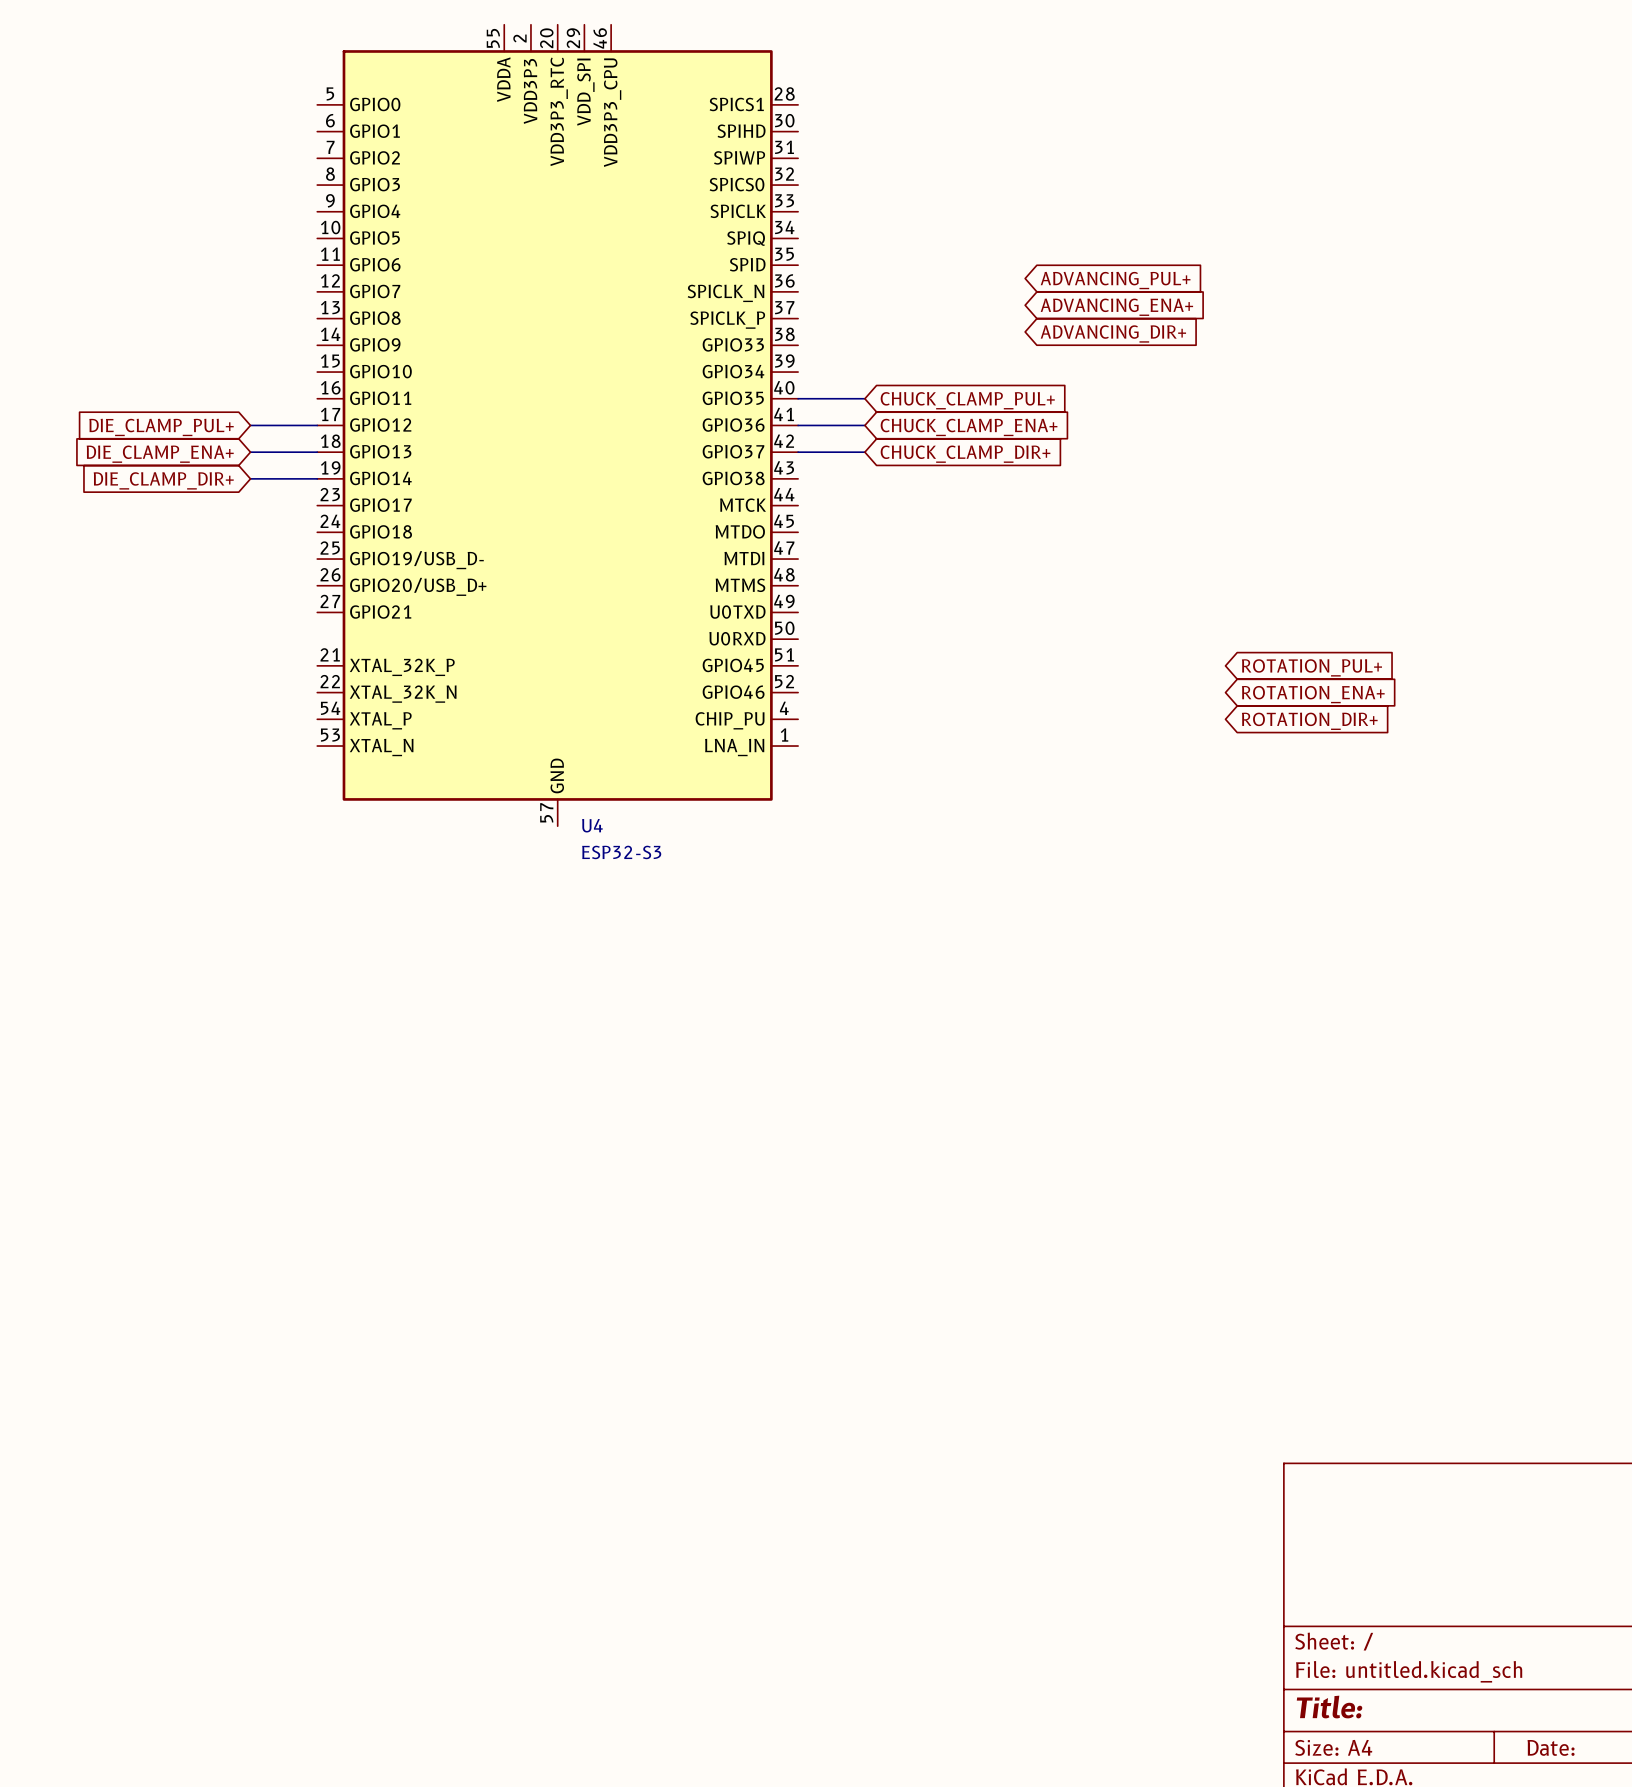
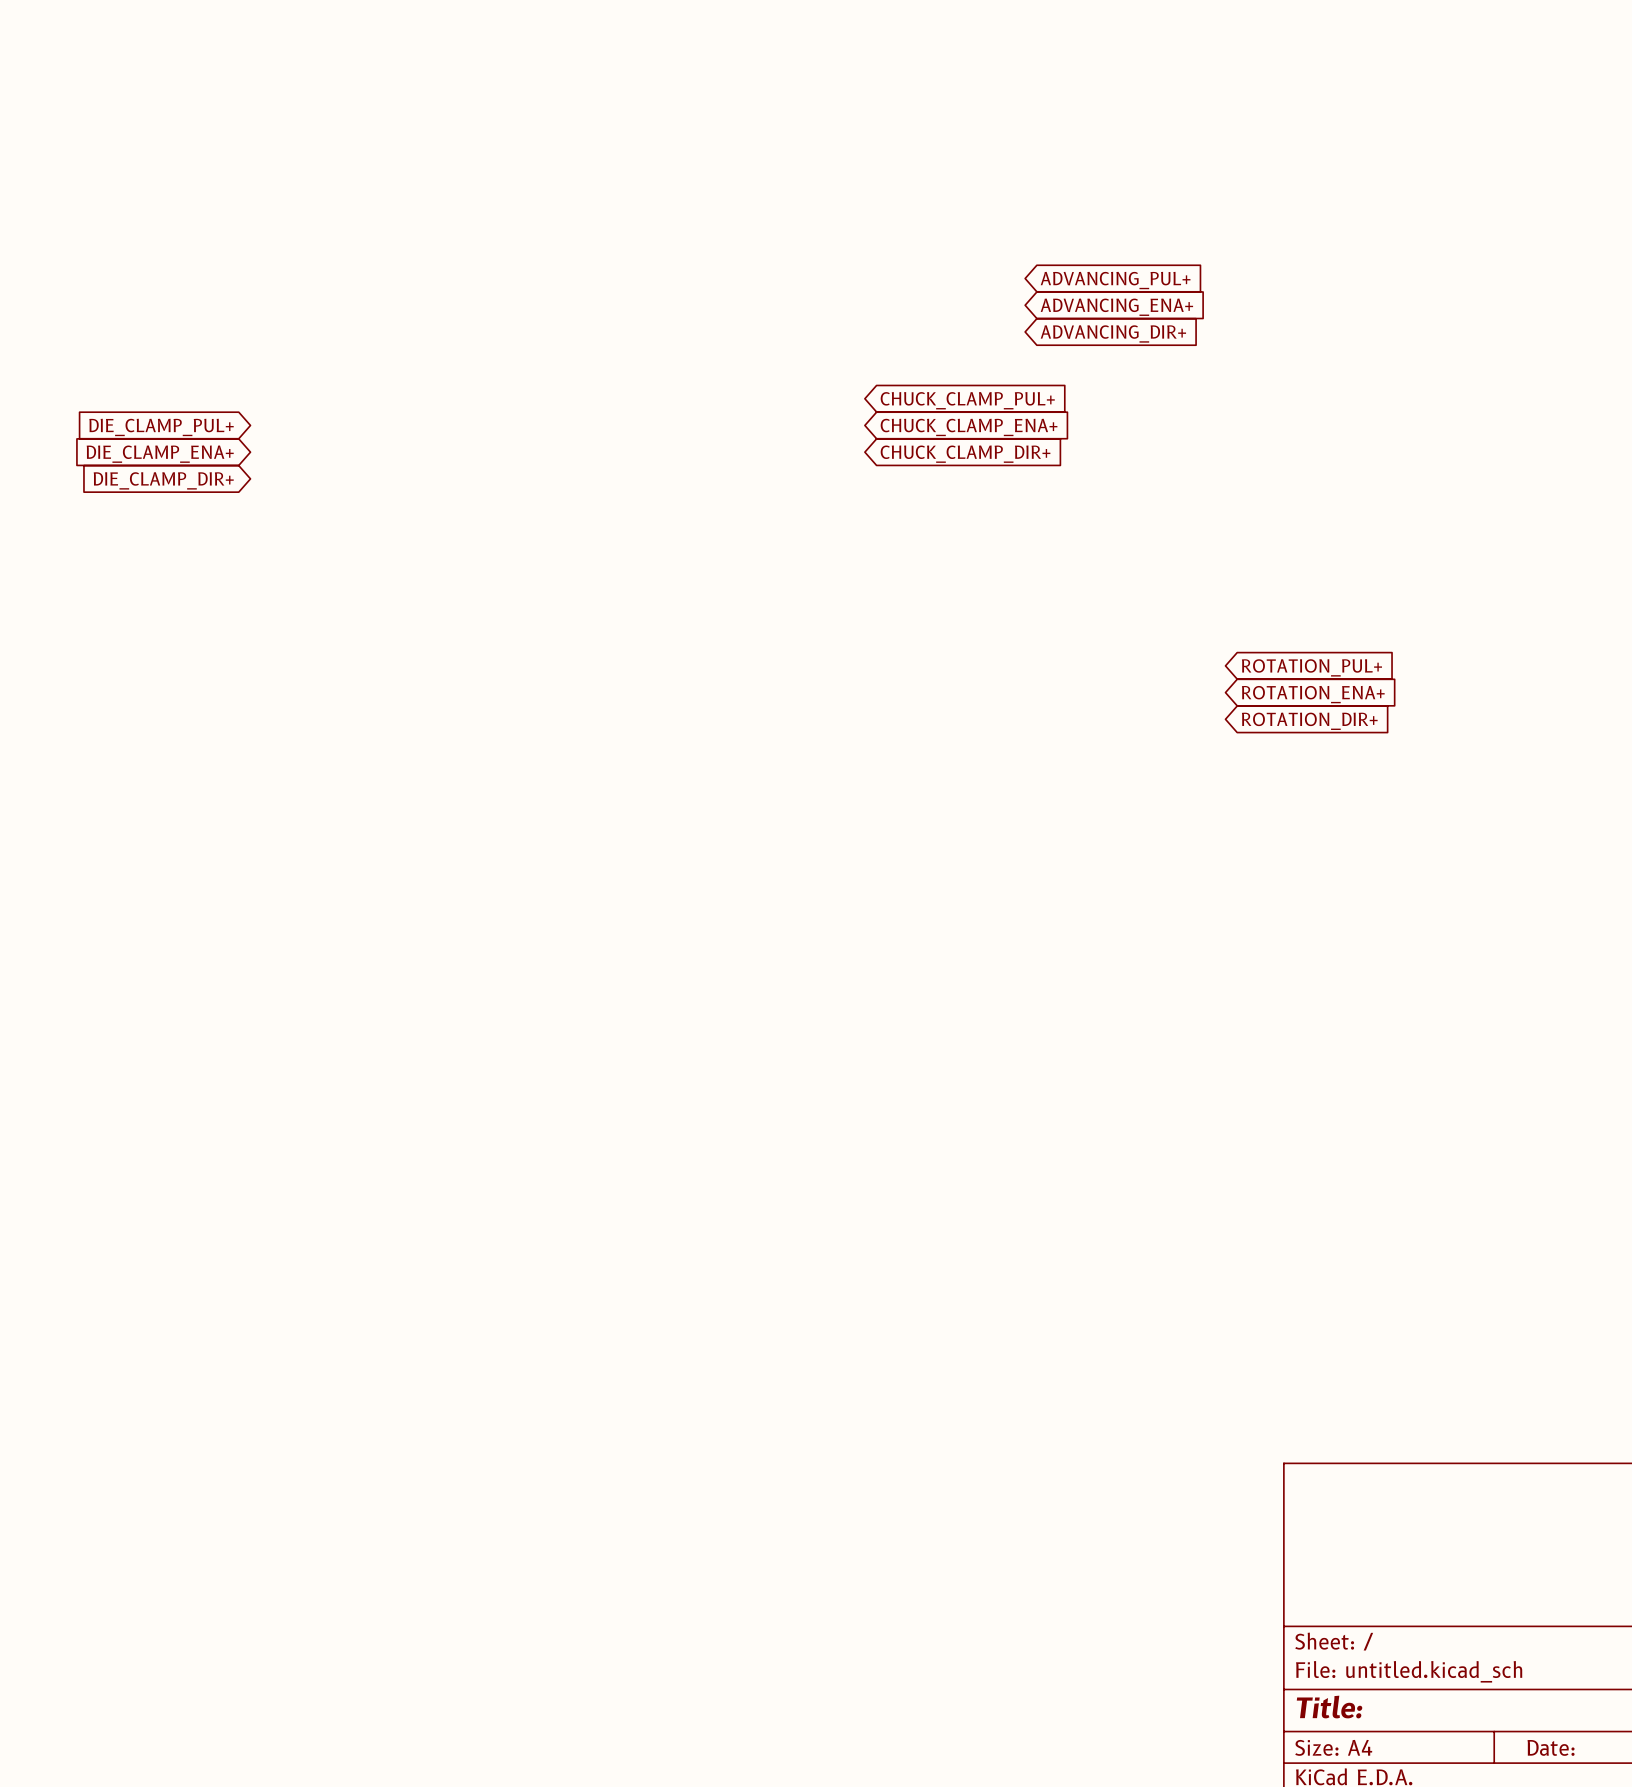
wire: (798, 398) (864, 398) -> none
wire: (250, 425) (317, 425) -> none
U4: ESP32-S3 (557, 425) -> none
wire: (798, 425) (864, 425) -> none
wire: (250, 452) (317, 452) -> none
wire: (798, 452) (864, 452) -> none
wire: (250, 478) (317, 478) -> none

